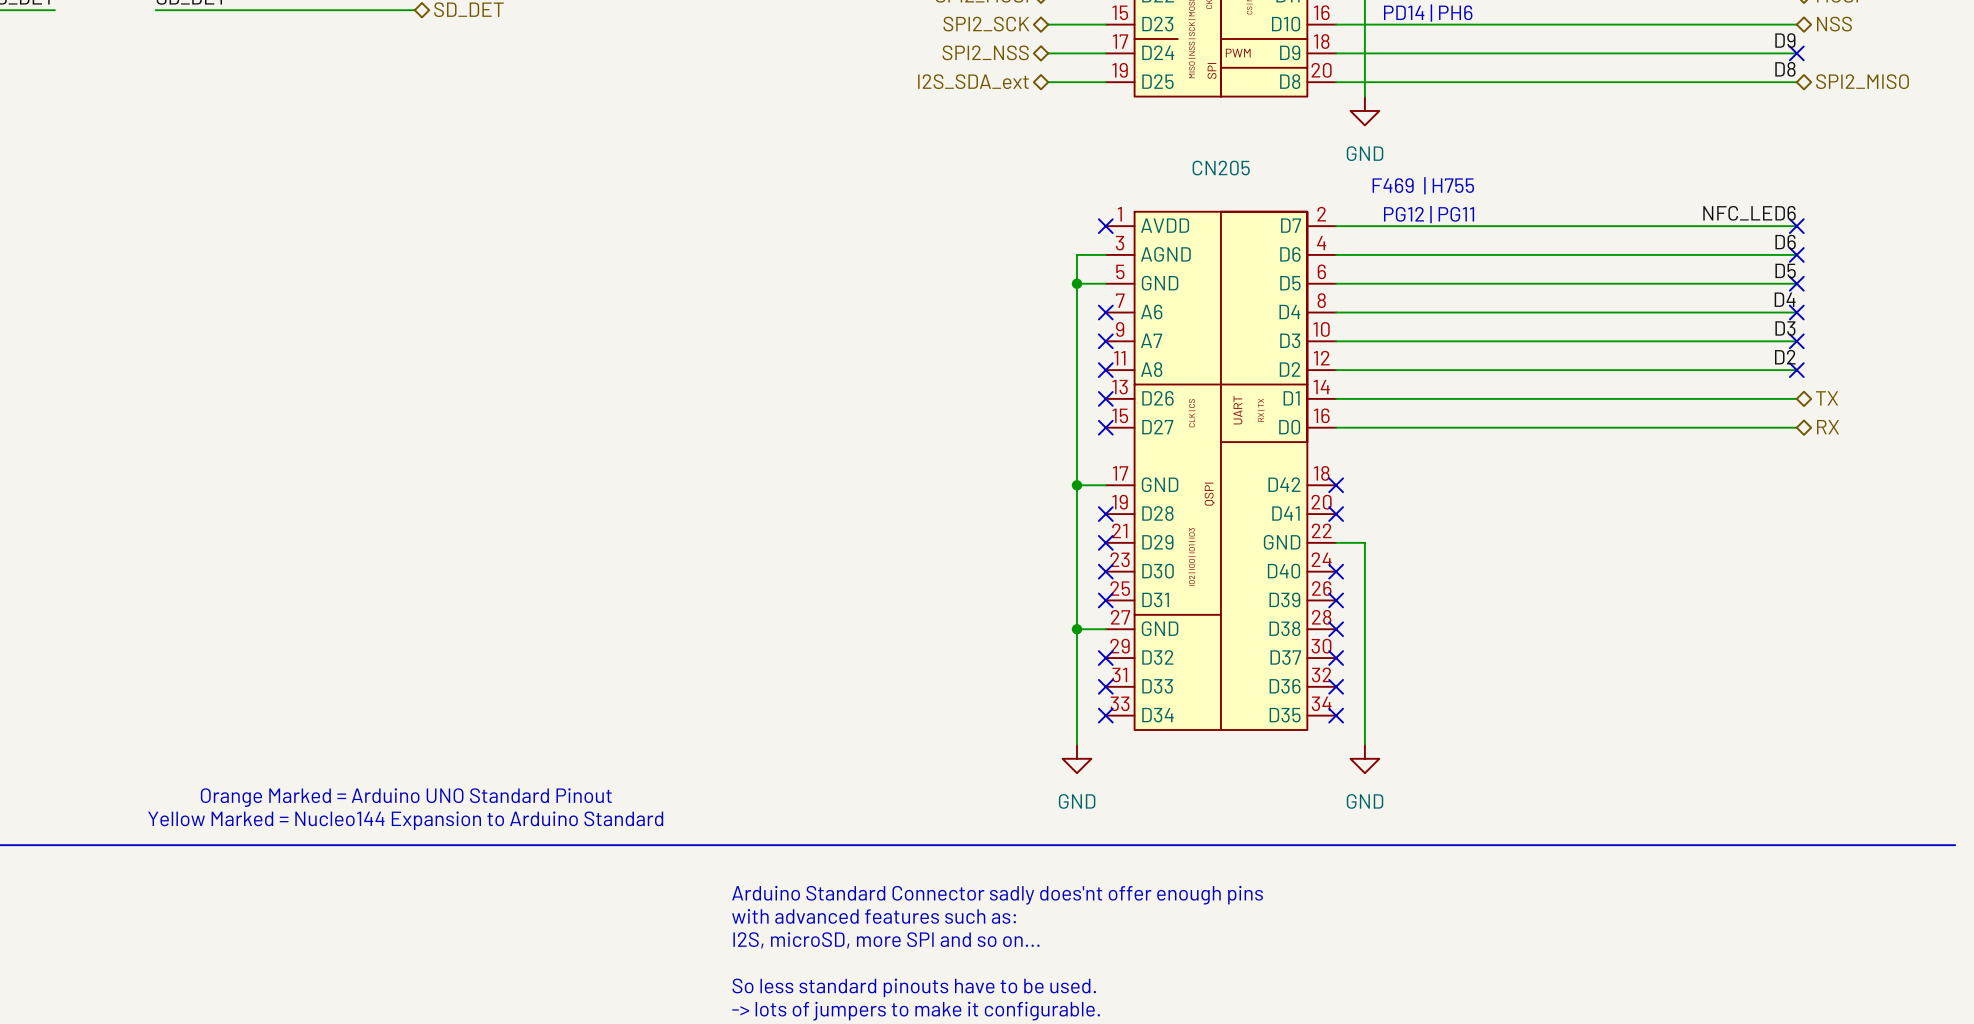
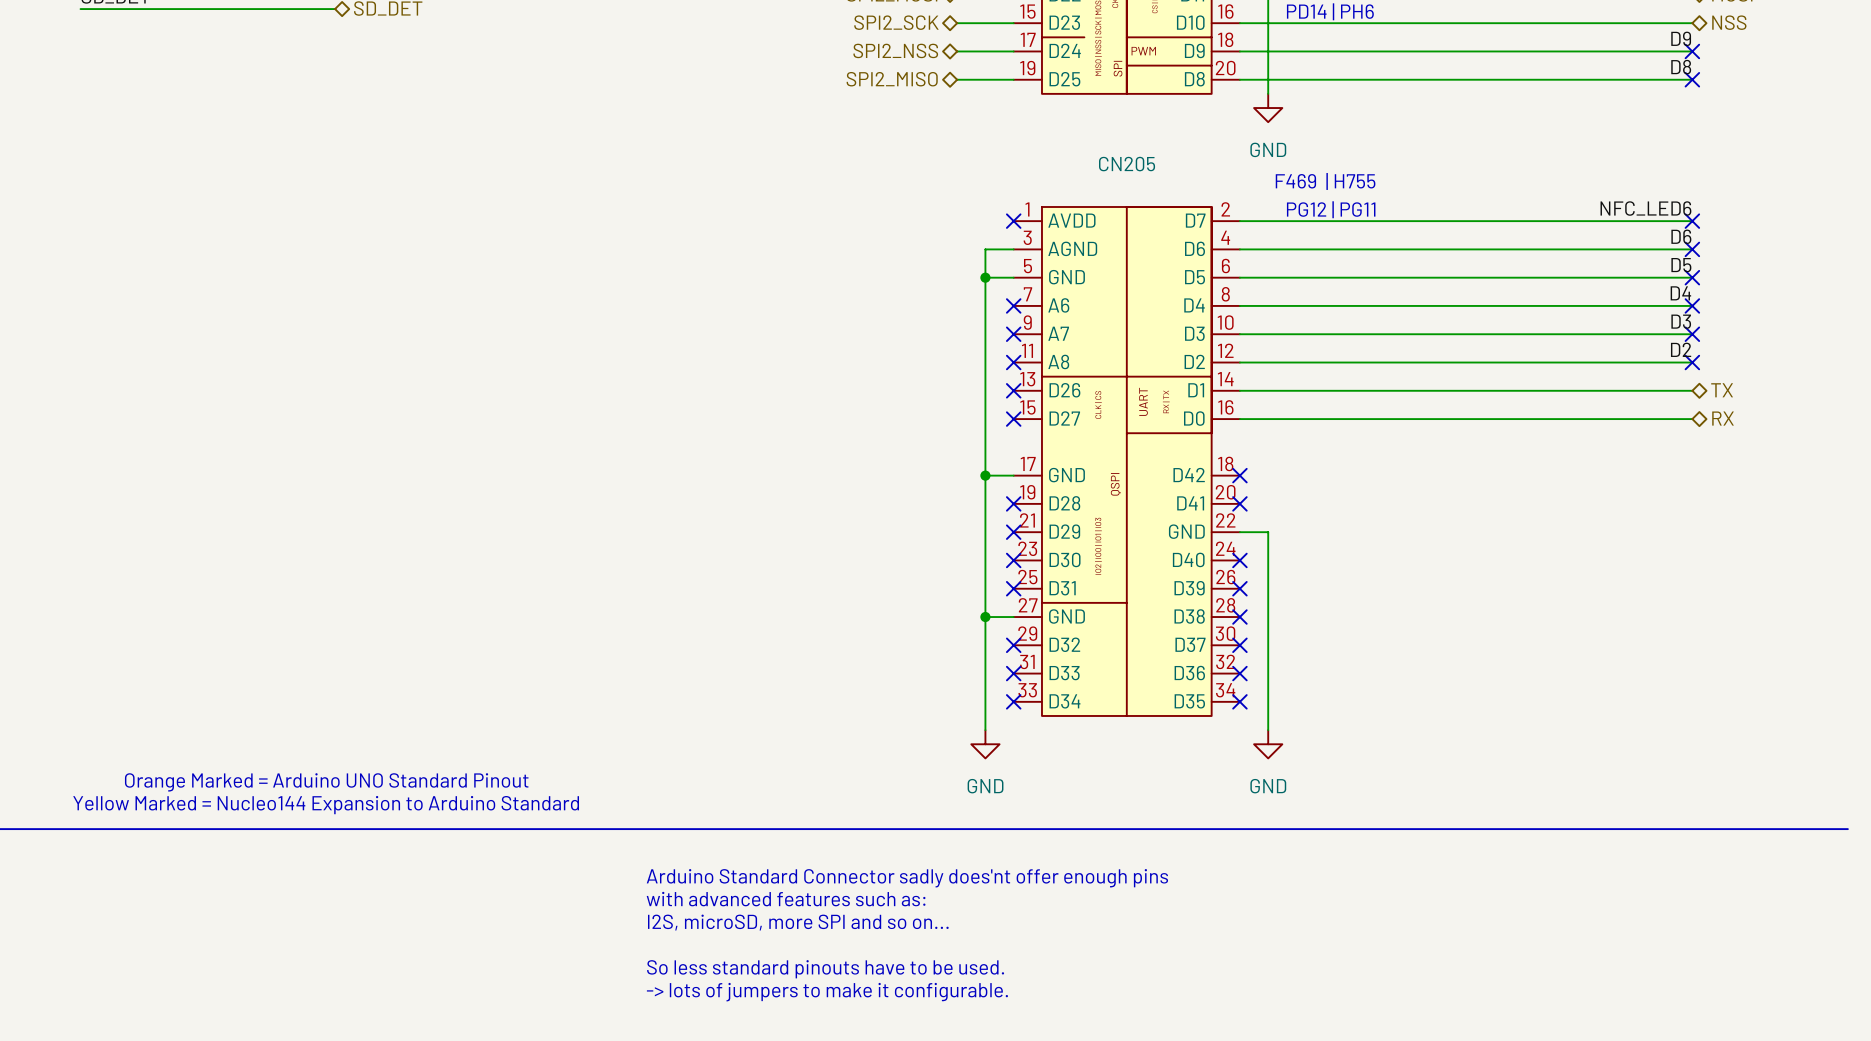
hierarchical label: I2S_SDA_ext (973, 81) -> SPI2_MISO (892, 79)
hierarchical label: SPI2_MISO (1862, 81) -> none
no-connect mark: none -> (1692, 79)

